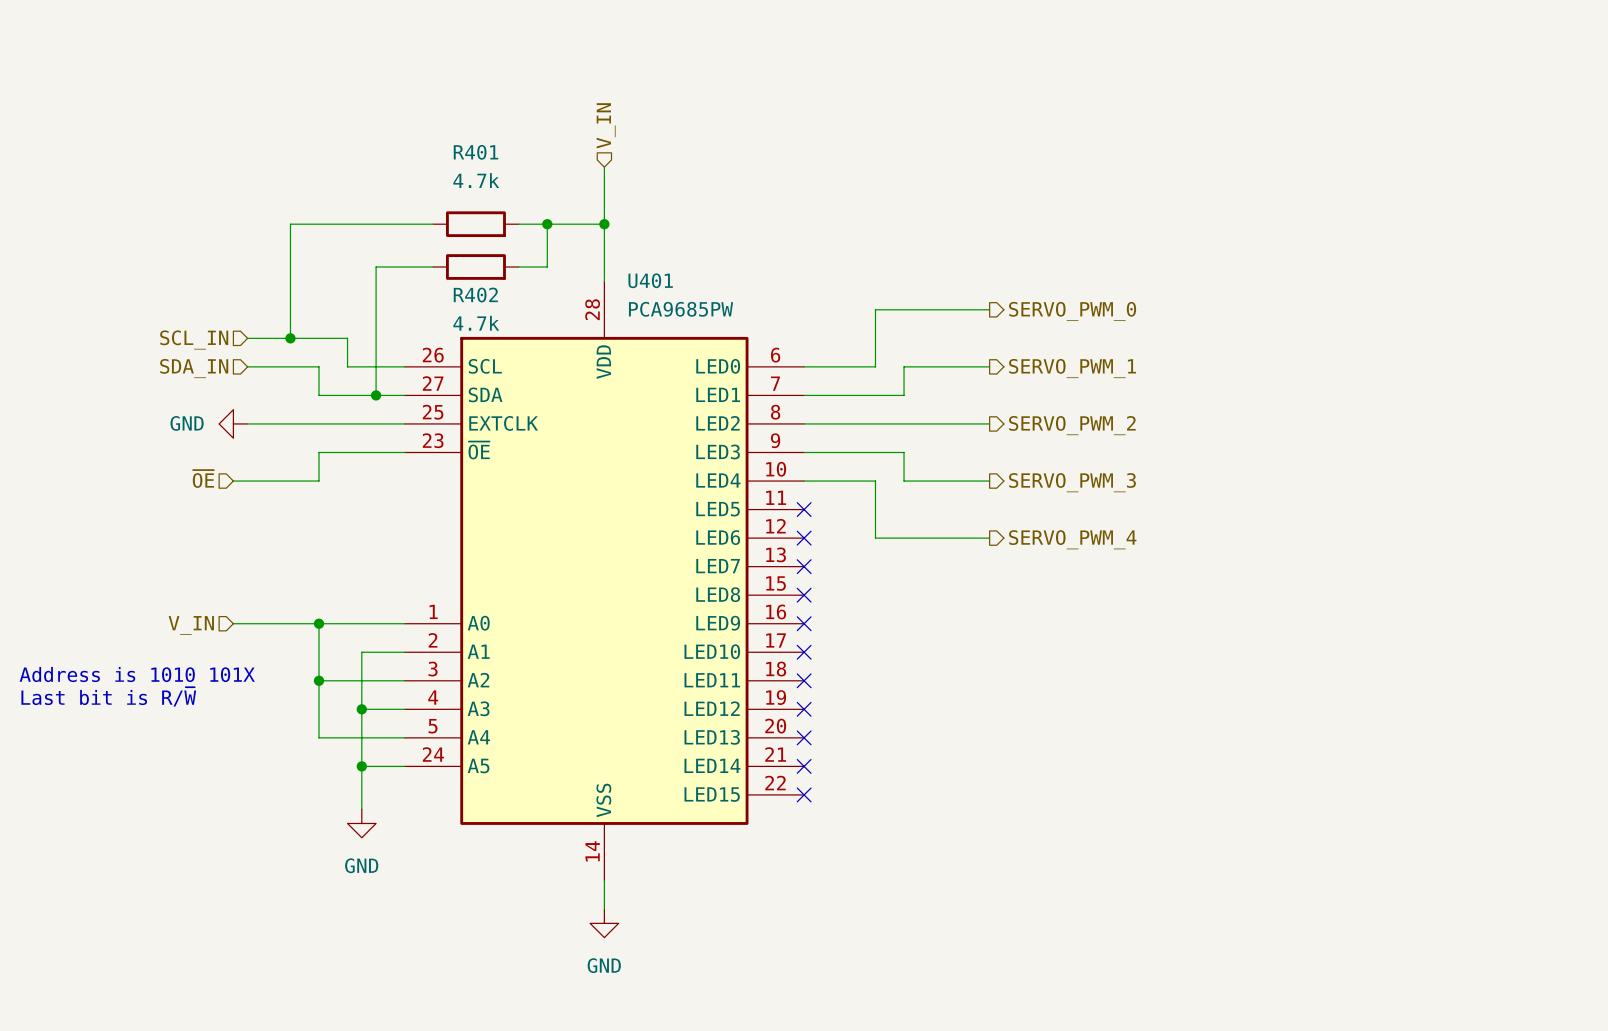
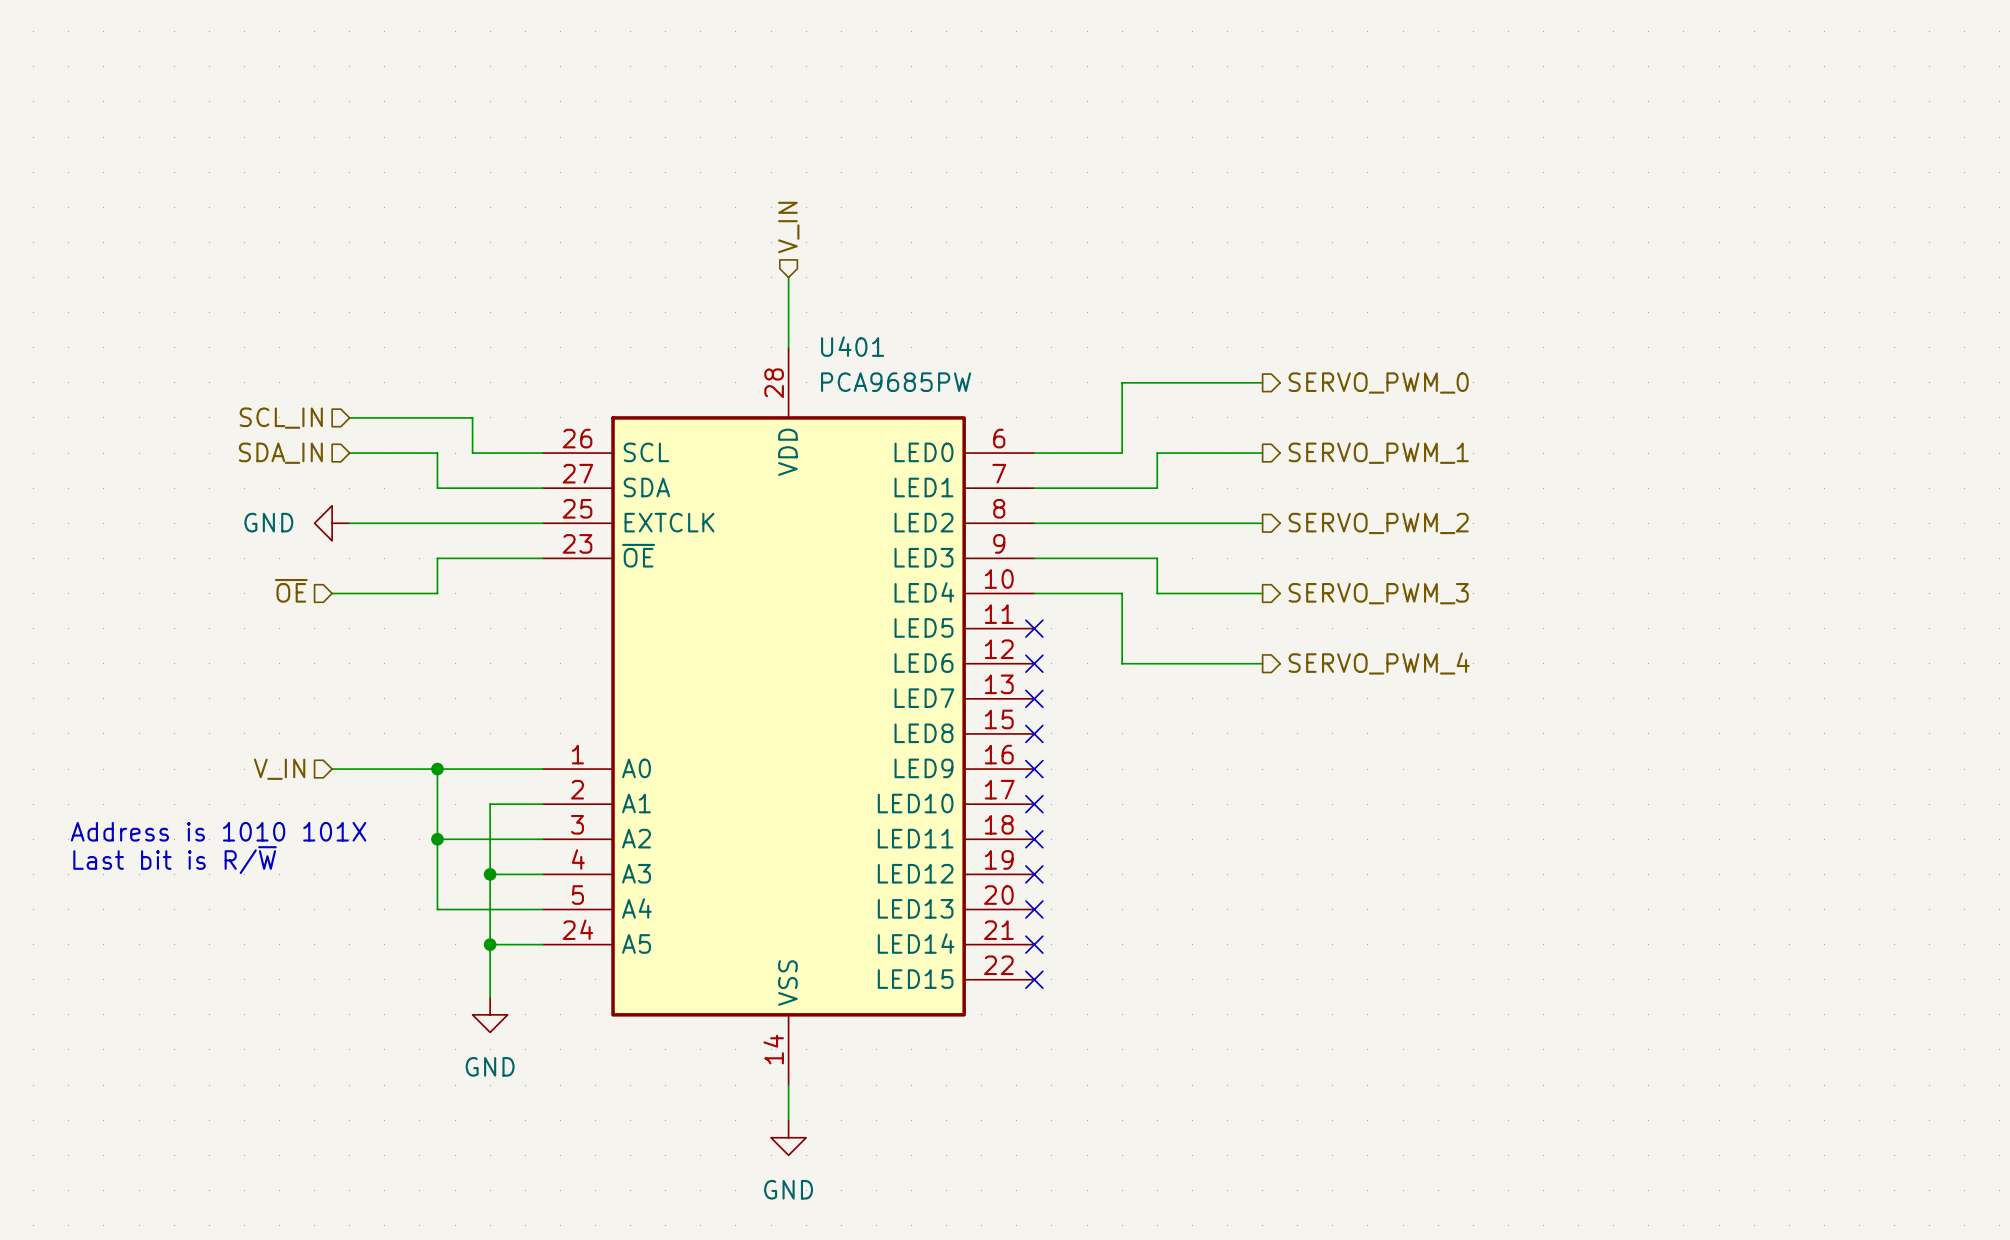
hierarchical label position: V_IN (606, 125) -> V_IN (788, 227)
wire: (604, 167) (604, 224) (518, 224) -> none
wire: (433, 224) (290, 224) (290, 338) -> none
R401: 4.7k (475, 224) -> none
wire: (547, 224) (547, 267) (518, 267) -> none
junction: (547, 224) -> none
junction: (604, 224) -> none
wire: (433, 267) (376, 267) (376, 395) -> none
R402: 4.7k (475, 267) -> none
junction: (290, 338) -> none
junction: (376, 395) -> none

